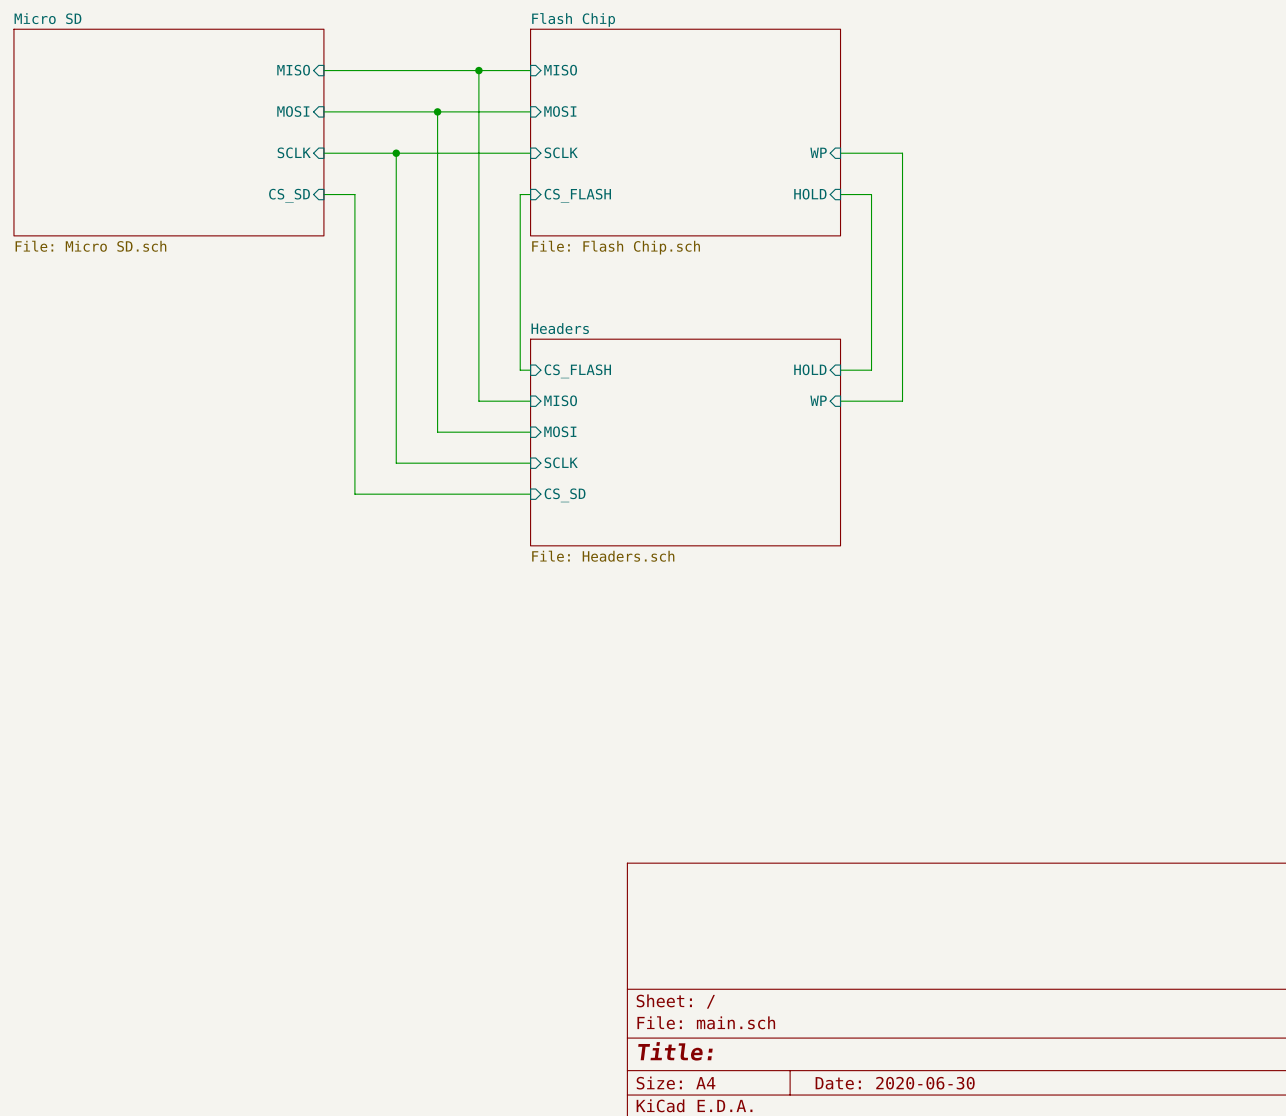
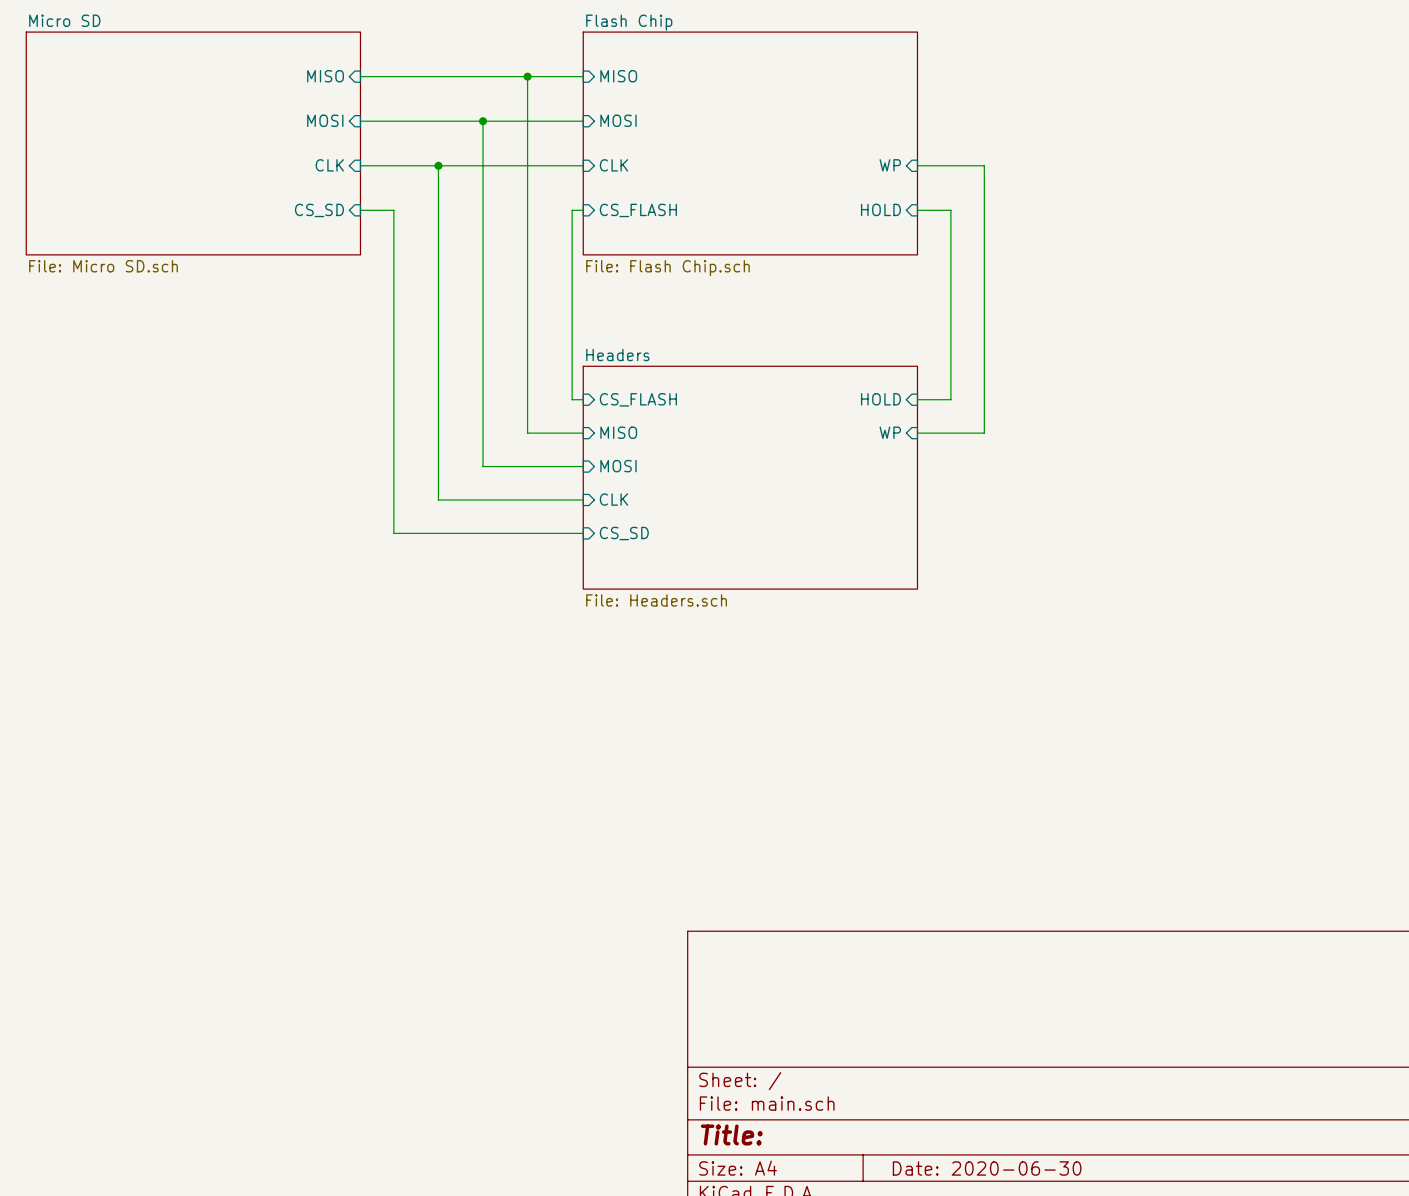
sheet pin: SCLK (294, 152) -> CLK (329, 165)
sheet pin: SCLK (561, 152) -> CLK (613, 165)
sheet pin: SCLK (561, 462) -> CLK (613, 499)

